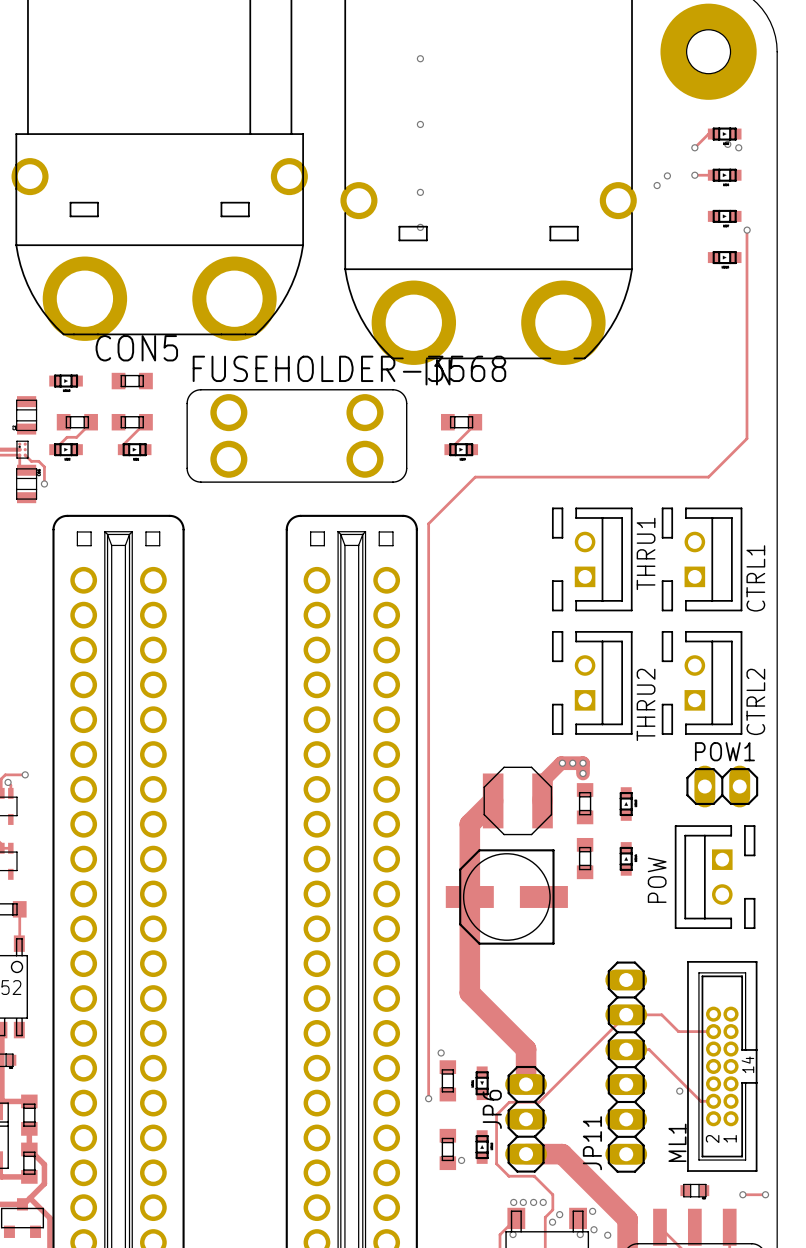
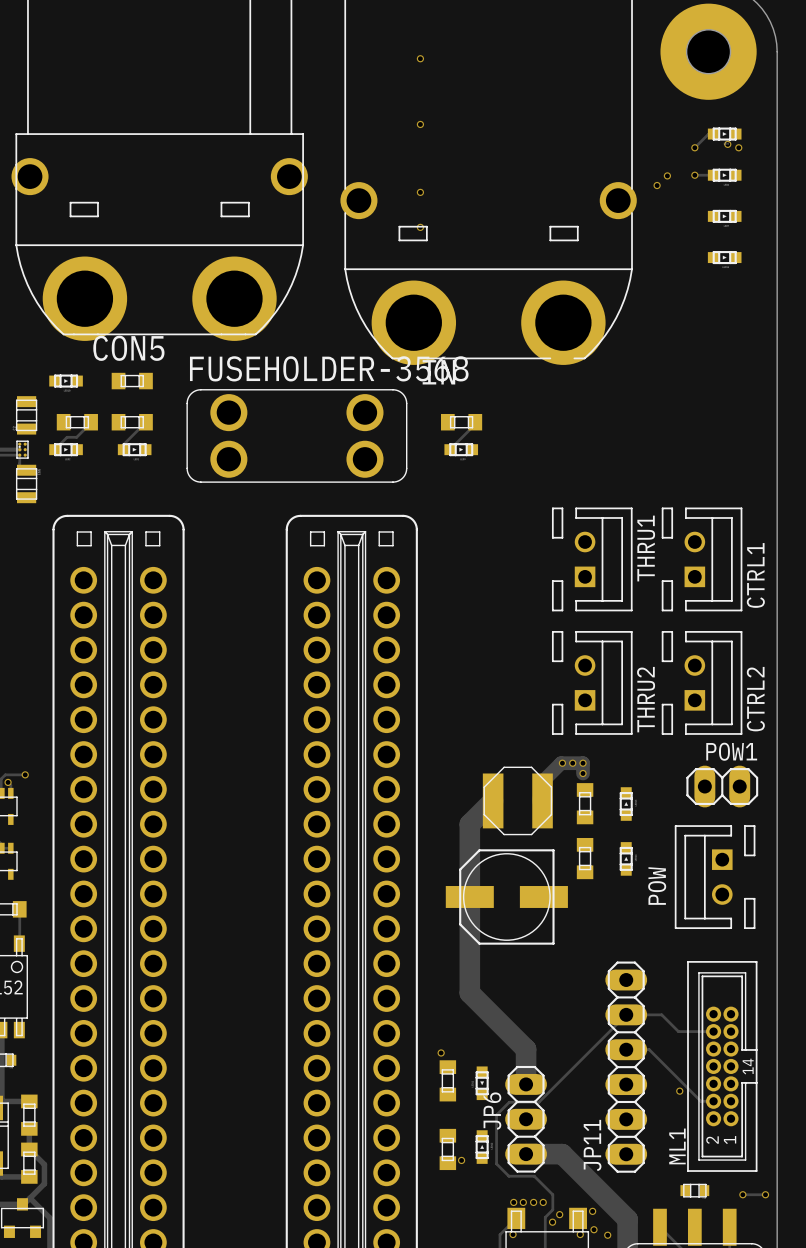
track: (746, 230) (746, 438) (708, 477) (475, 477) (428, 523) (428, 1098) -> none
via: (747, 230) -> none
track: (25, 455) (31, 461) (38, 461) (44, 466) (44, 483) -> none
via: (44, 483) -> none
via: (428, 1098) -> none

